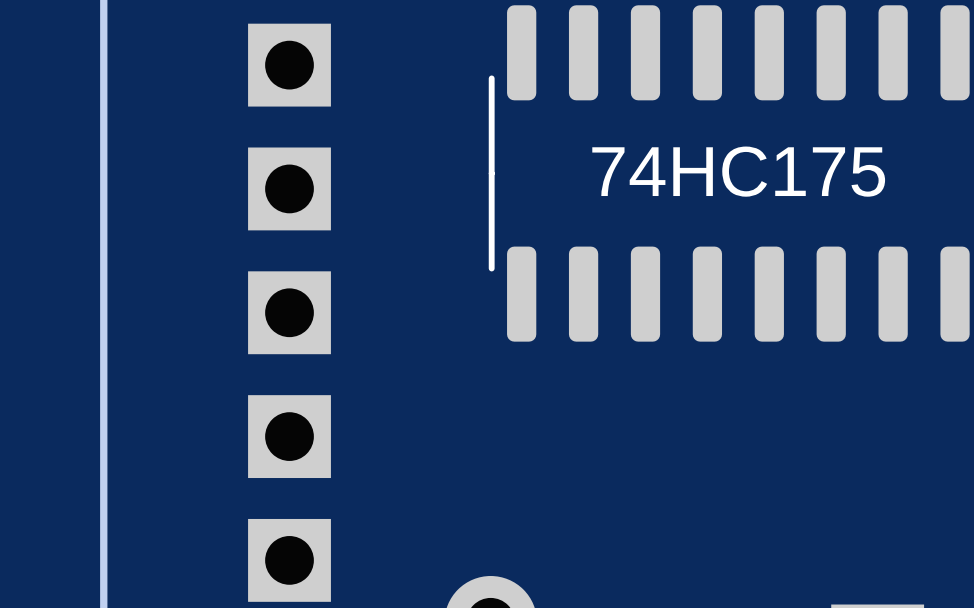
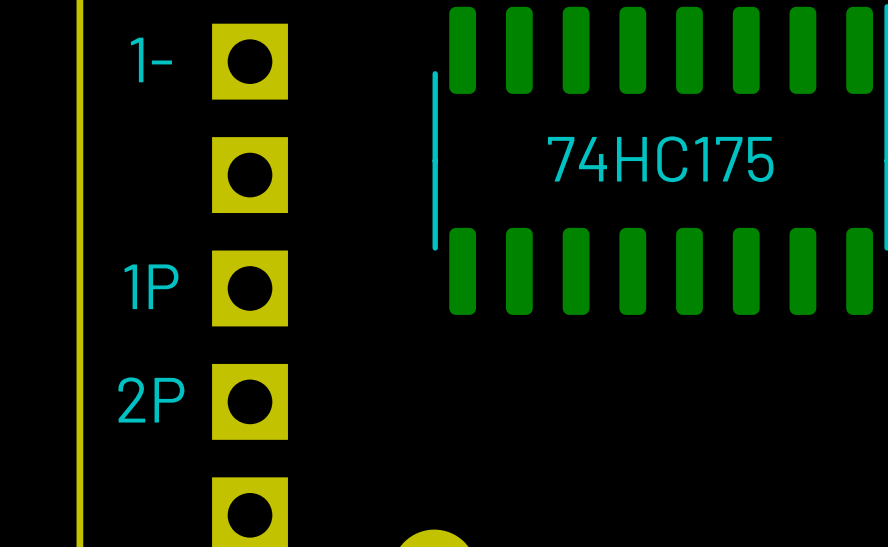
text: none -> 1- (151, 59)
text: none -> 1P (151, 286)
text: none -> 2P (151, 399)

